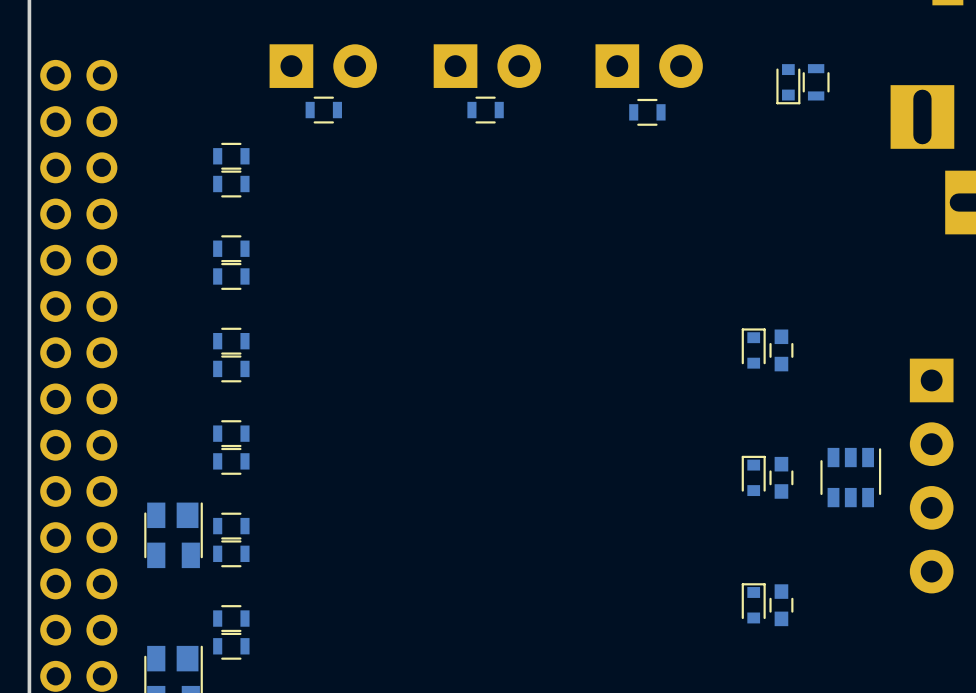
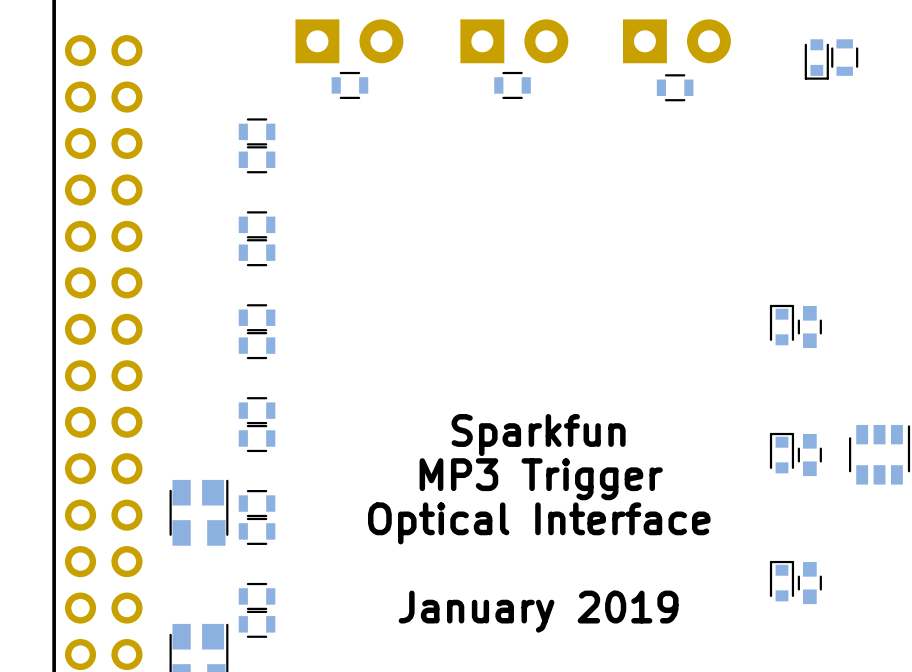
text: none -> Sparkfun (538, 435)
text: none -> MP3 Trigger (541, 479)
text: none -> Optical Interface (539, 523)
text: none -> January 2019 (538, 611)

